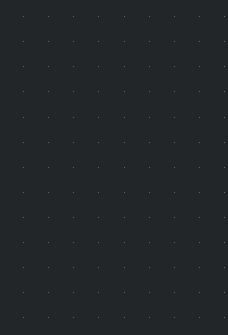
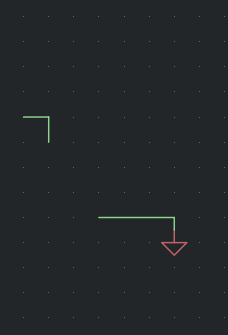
wire: none -> (23, 117) (48, 117) (48, 142)
wire: none -> (98, 217) (174, 217) (174, 230)
power symbol: none -> (174, 242)

